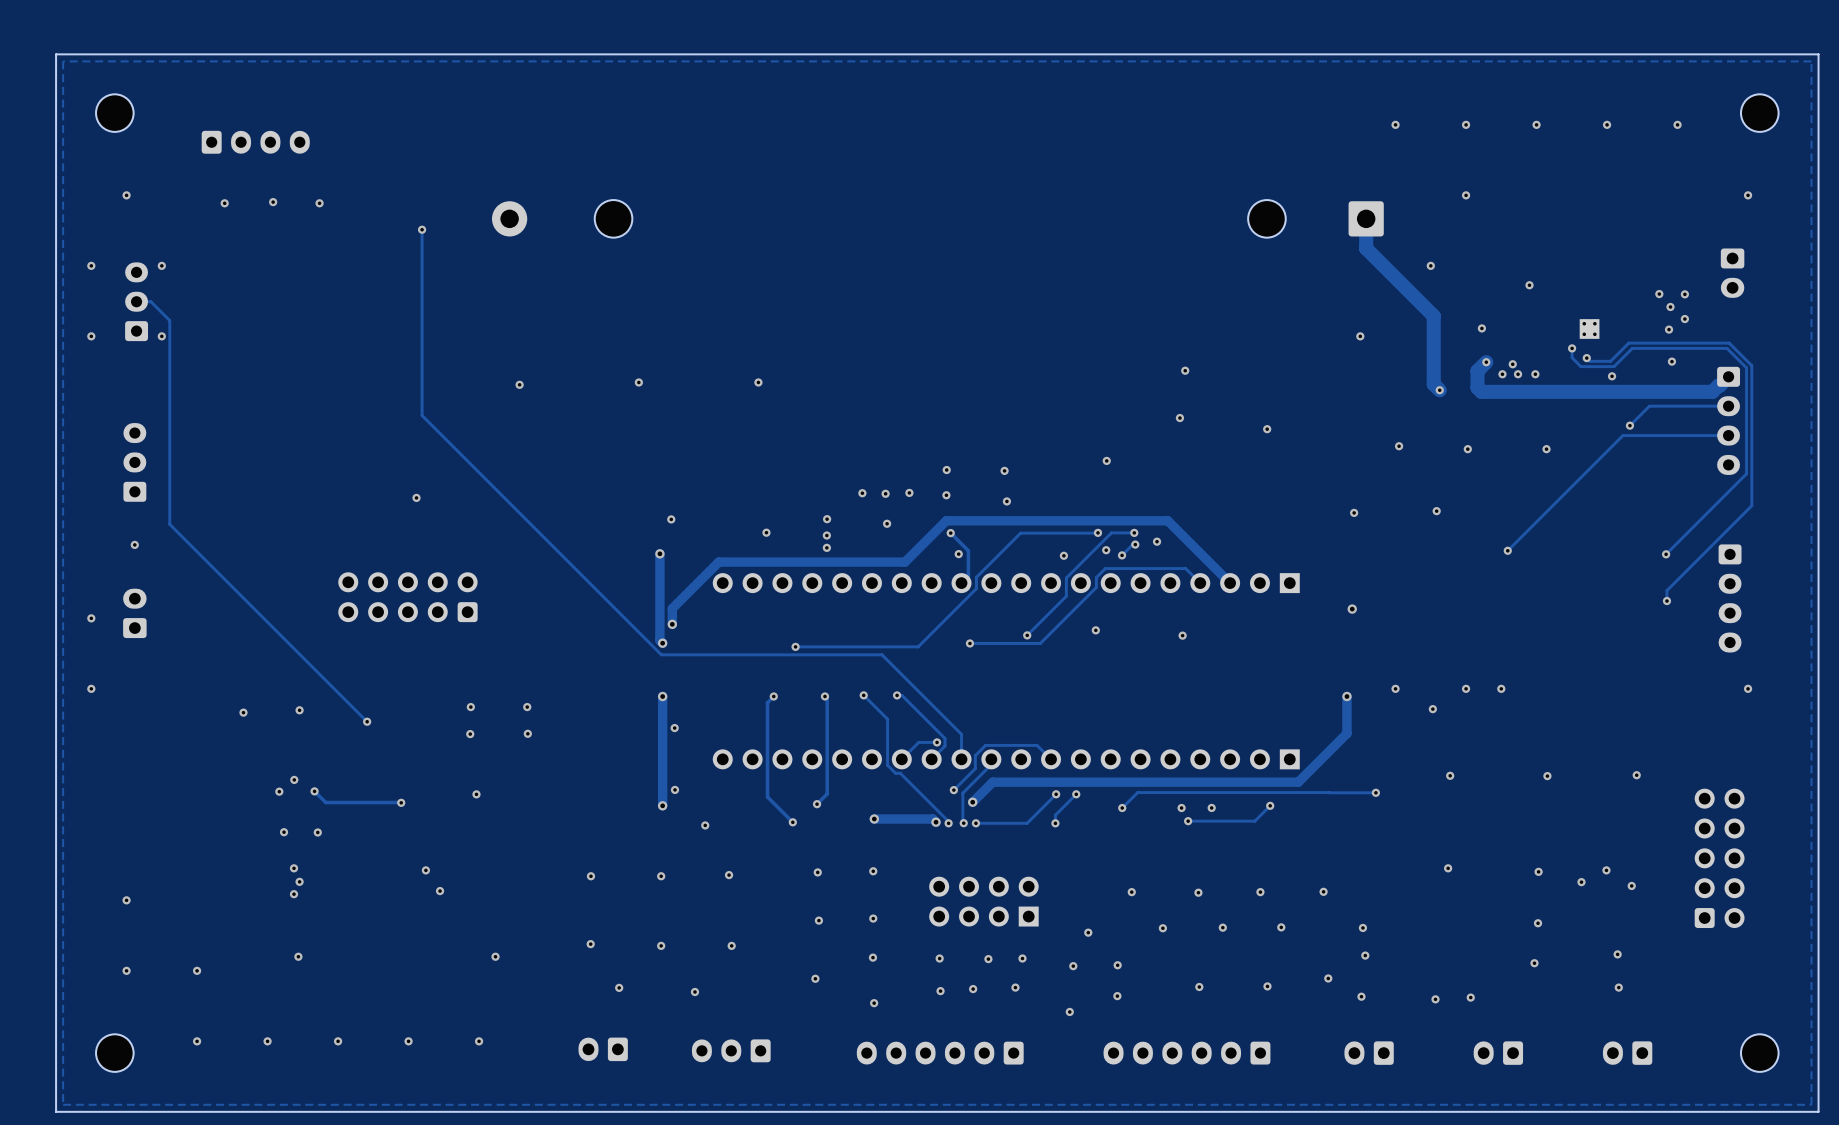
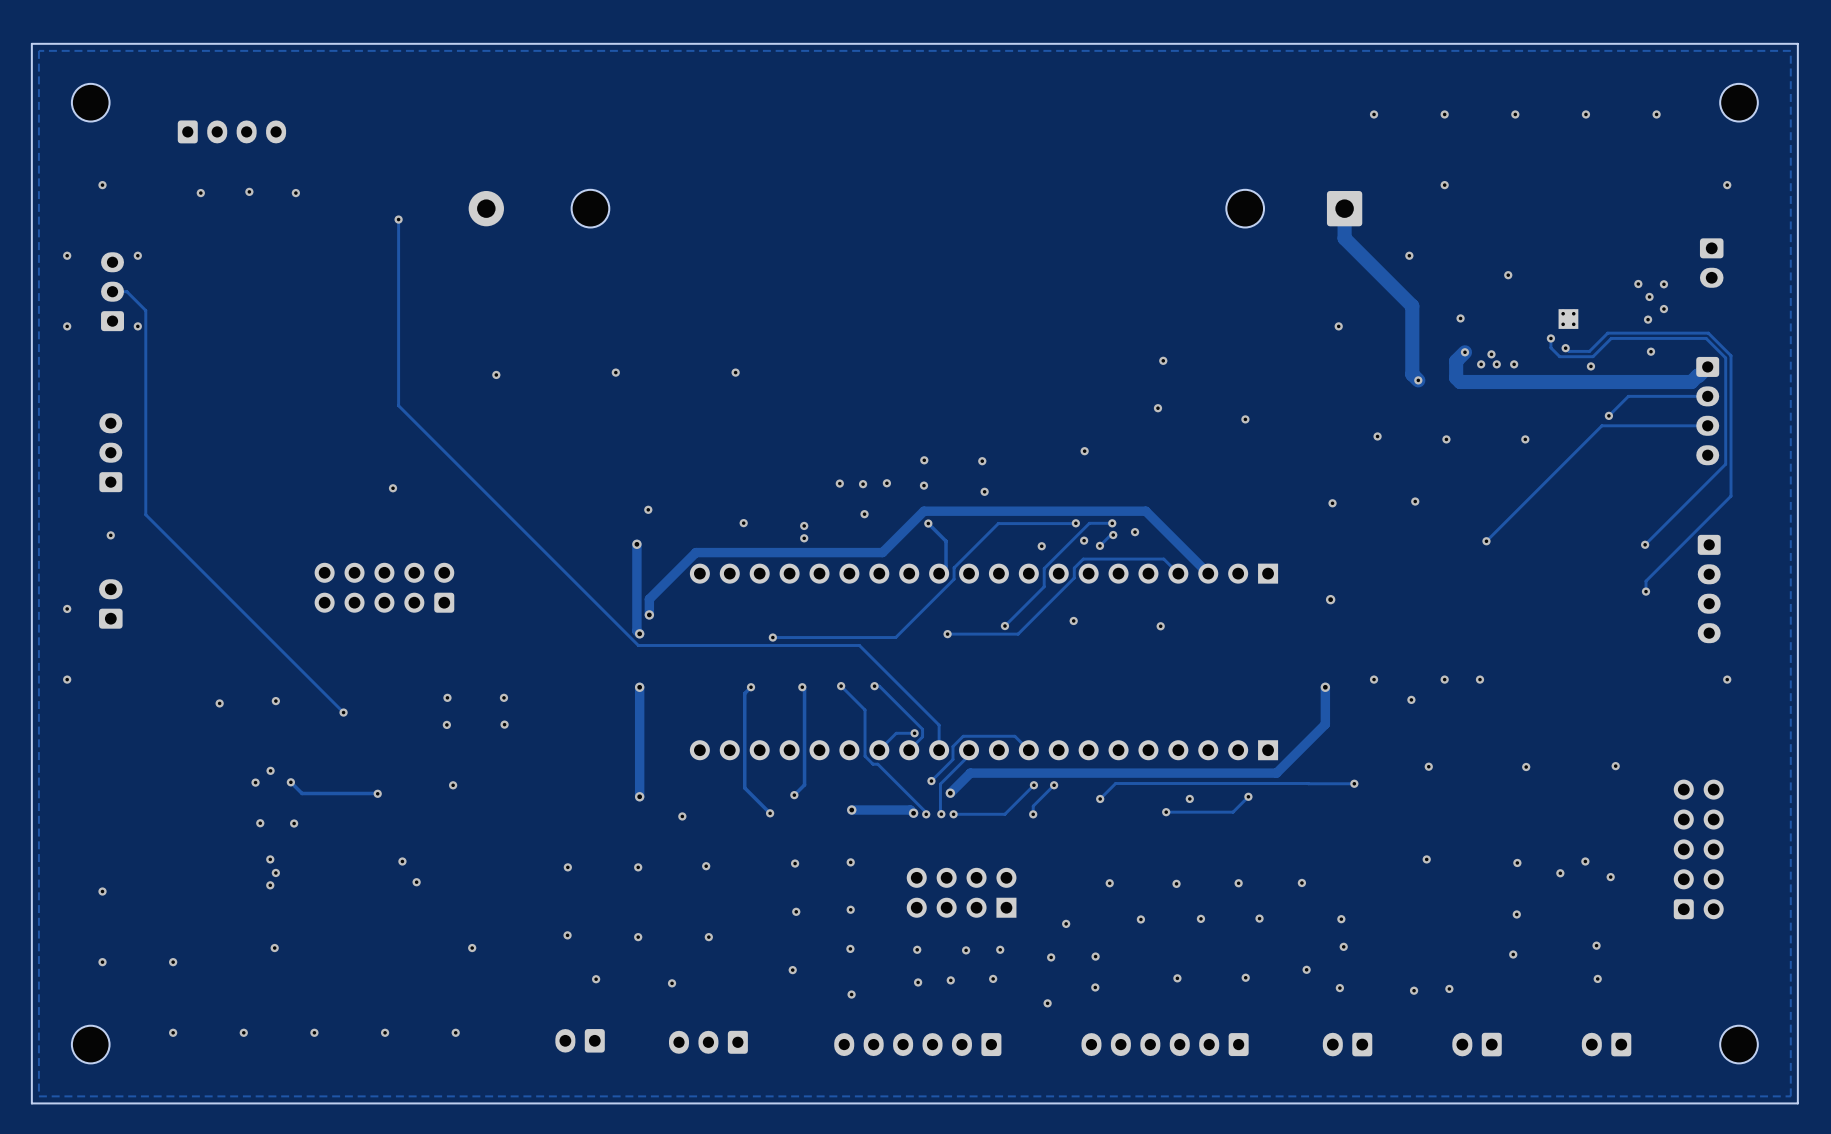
via: (827, 519) -> none
via: (958, 554) -> none
via: (674, 728) -> none
via: (674, 789) -> none
via: (1181, 808) -> none

